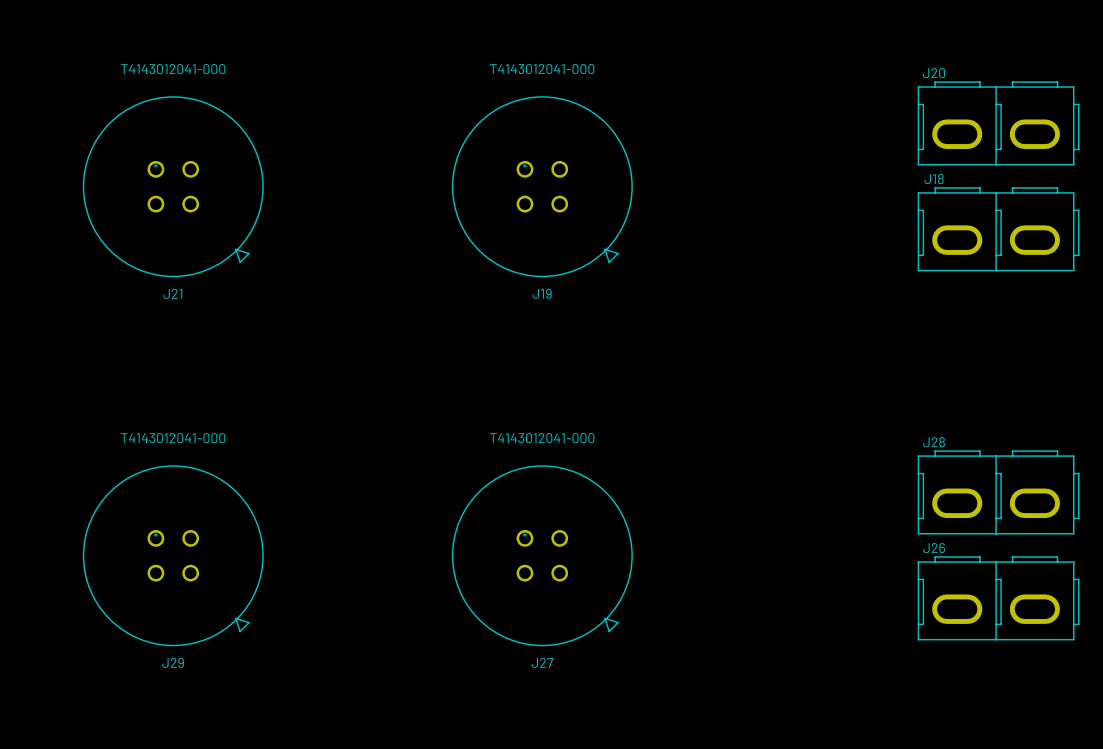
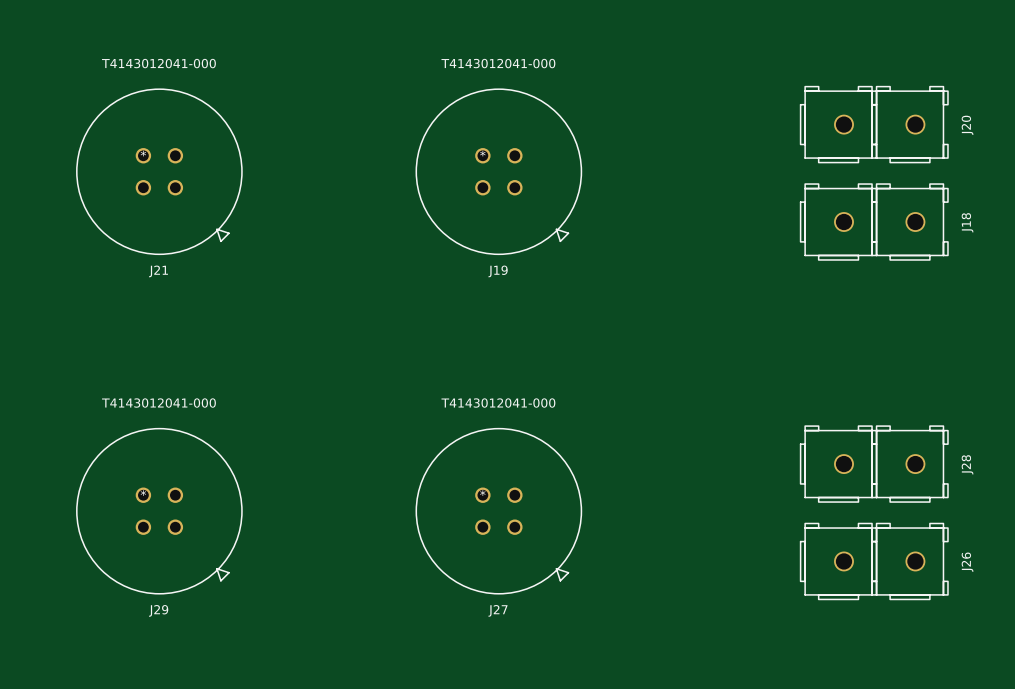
J20 name position: J20 (933, 73) -> J20 (967, 125)
J20 footprint: [917, 81, 1080, 166] -> [800, 86, 949, 164]
J18 name position: J18 (934, 179) -> J18 (967, 222)
J18 footprint: [917, 187, 1080, 272] -> [800, 183, 949, 261]
J28 name position: J28 (934, 442) -> J28 (967, 464)
J28 footprint: [917, 450, 1080, 535] -> [800, 425, 949, 503]
J26 name position: J26 (934, 548) -> J26 (967, 562)
J26 footprint: [917, 556, 1080, 641] -> [800, 522, 949, 600]

